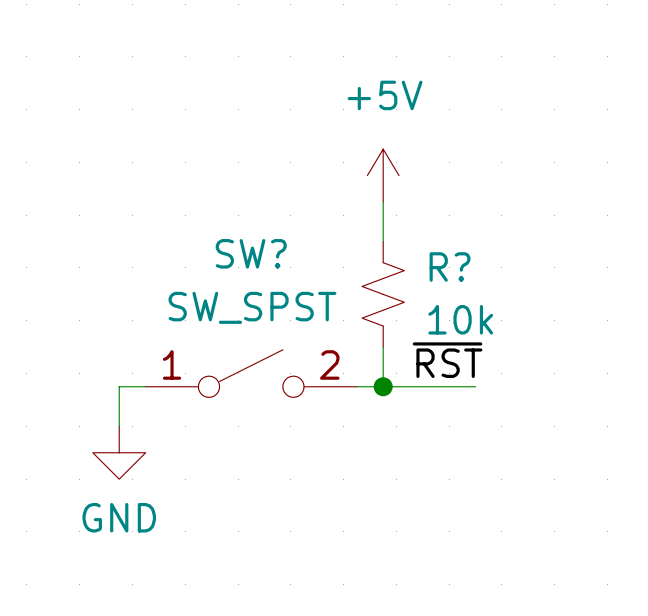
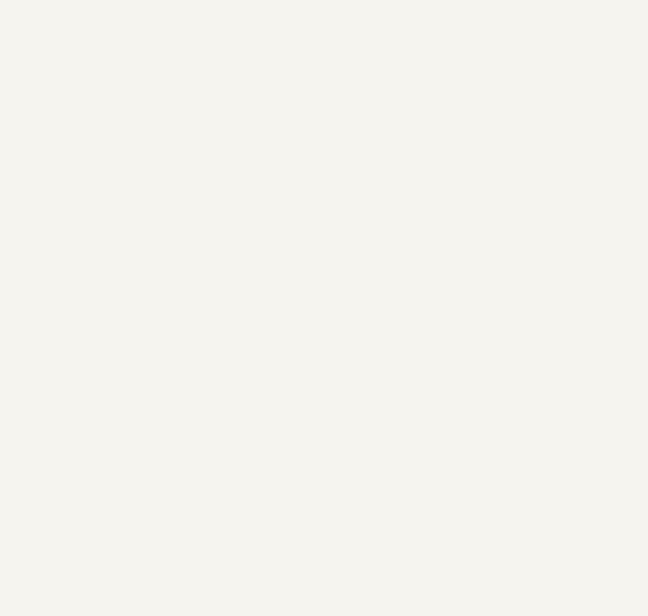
power symbol: +5V (383, 175) -> none
wire: (383, 201) (383, 241) -> none
R?: 10k (383, 294) -> none
wire: (383, 347) (383, 386) -> none
label: ~{RST} (447, 360) -> none
SW?: SW_SPST (251, 373) -> none
wire: (145, 386) (119, 386) (119, 426) -> none
wire: (356, 386) (475, 386) -> none
junction: (383, 386) -> none
power symbol: GND (119, 452) -> none

